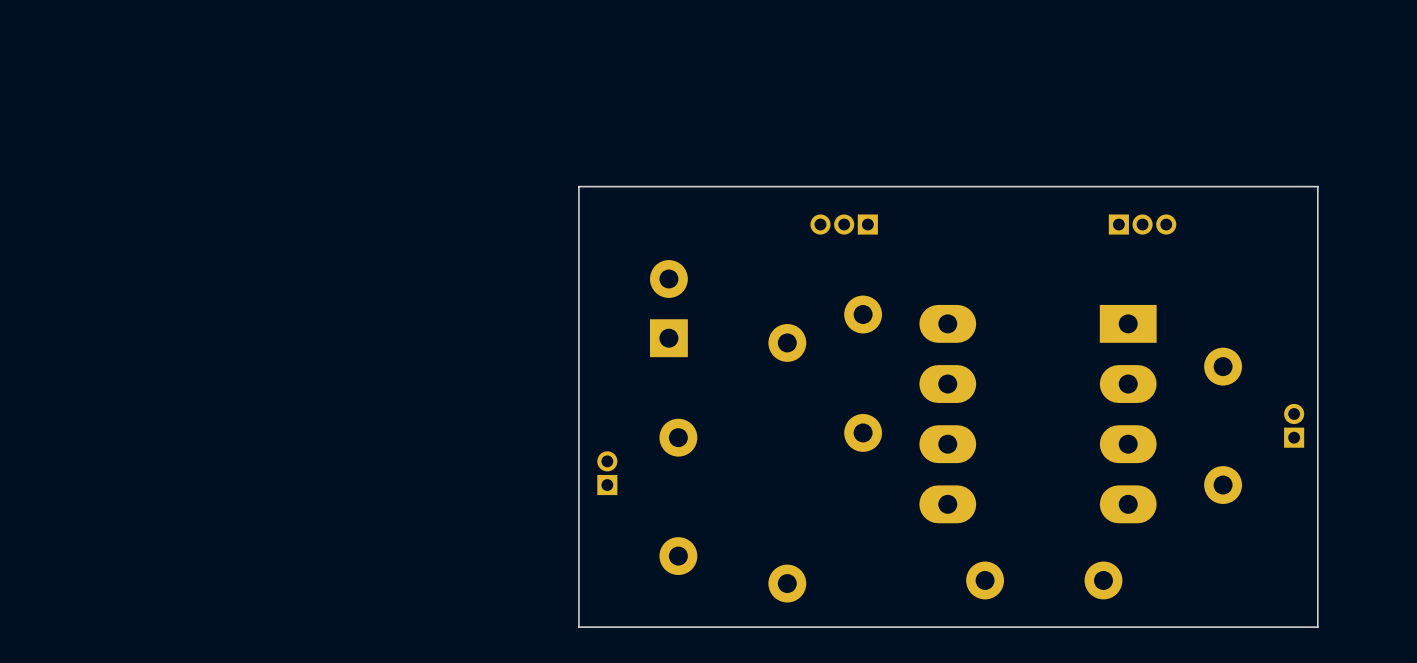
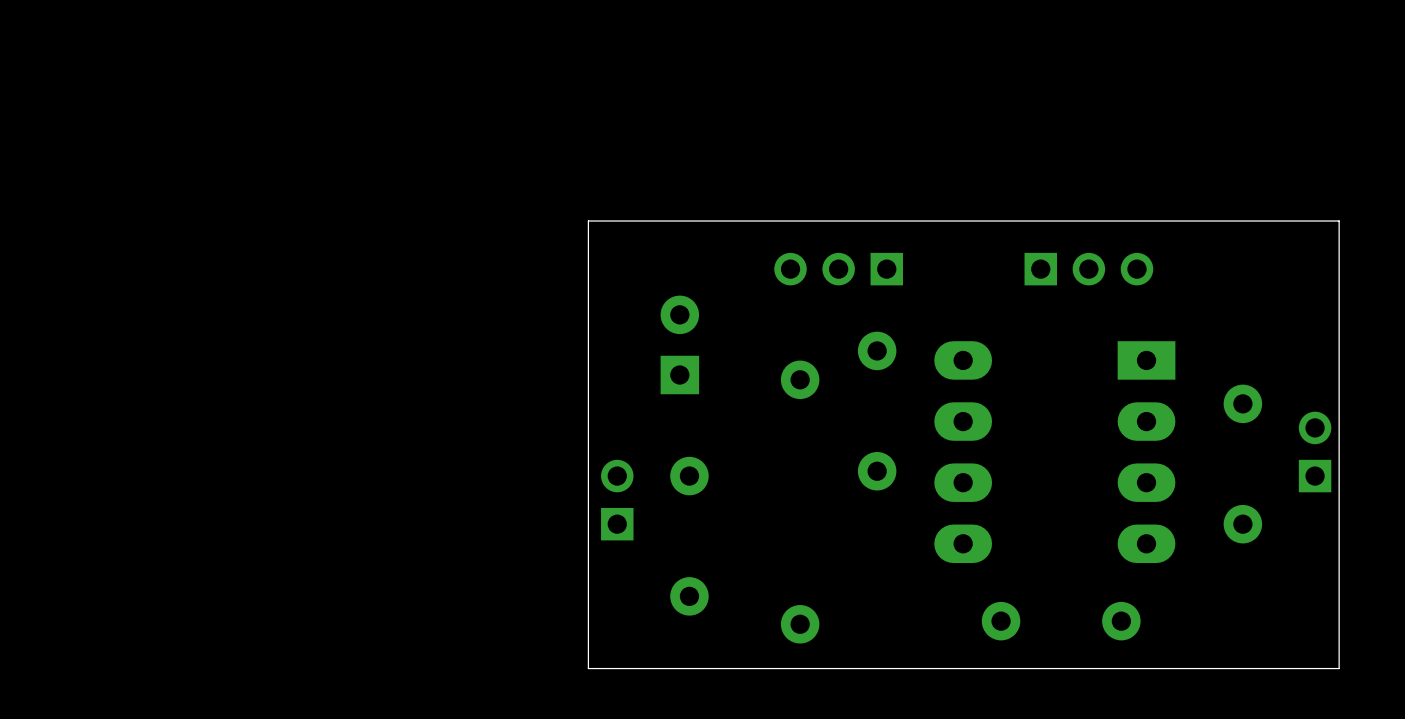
part footprint: [810, 214, 878, 235] -> [774, 252, 904, 286]
part: (1142, 224) -> none
part: none -> (1088, 269)
part footprint: [1284, 403, 1305, 448] -> [1298, 411, 1332, 493]
part footprint: [597, 451, 618, 496] -> [601, 459, 634, 541]

